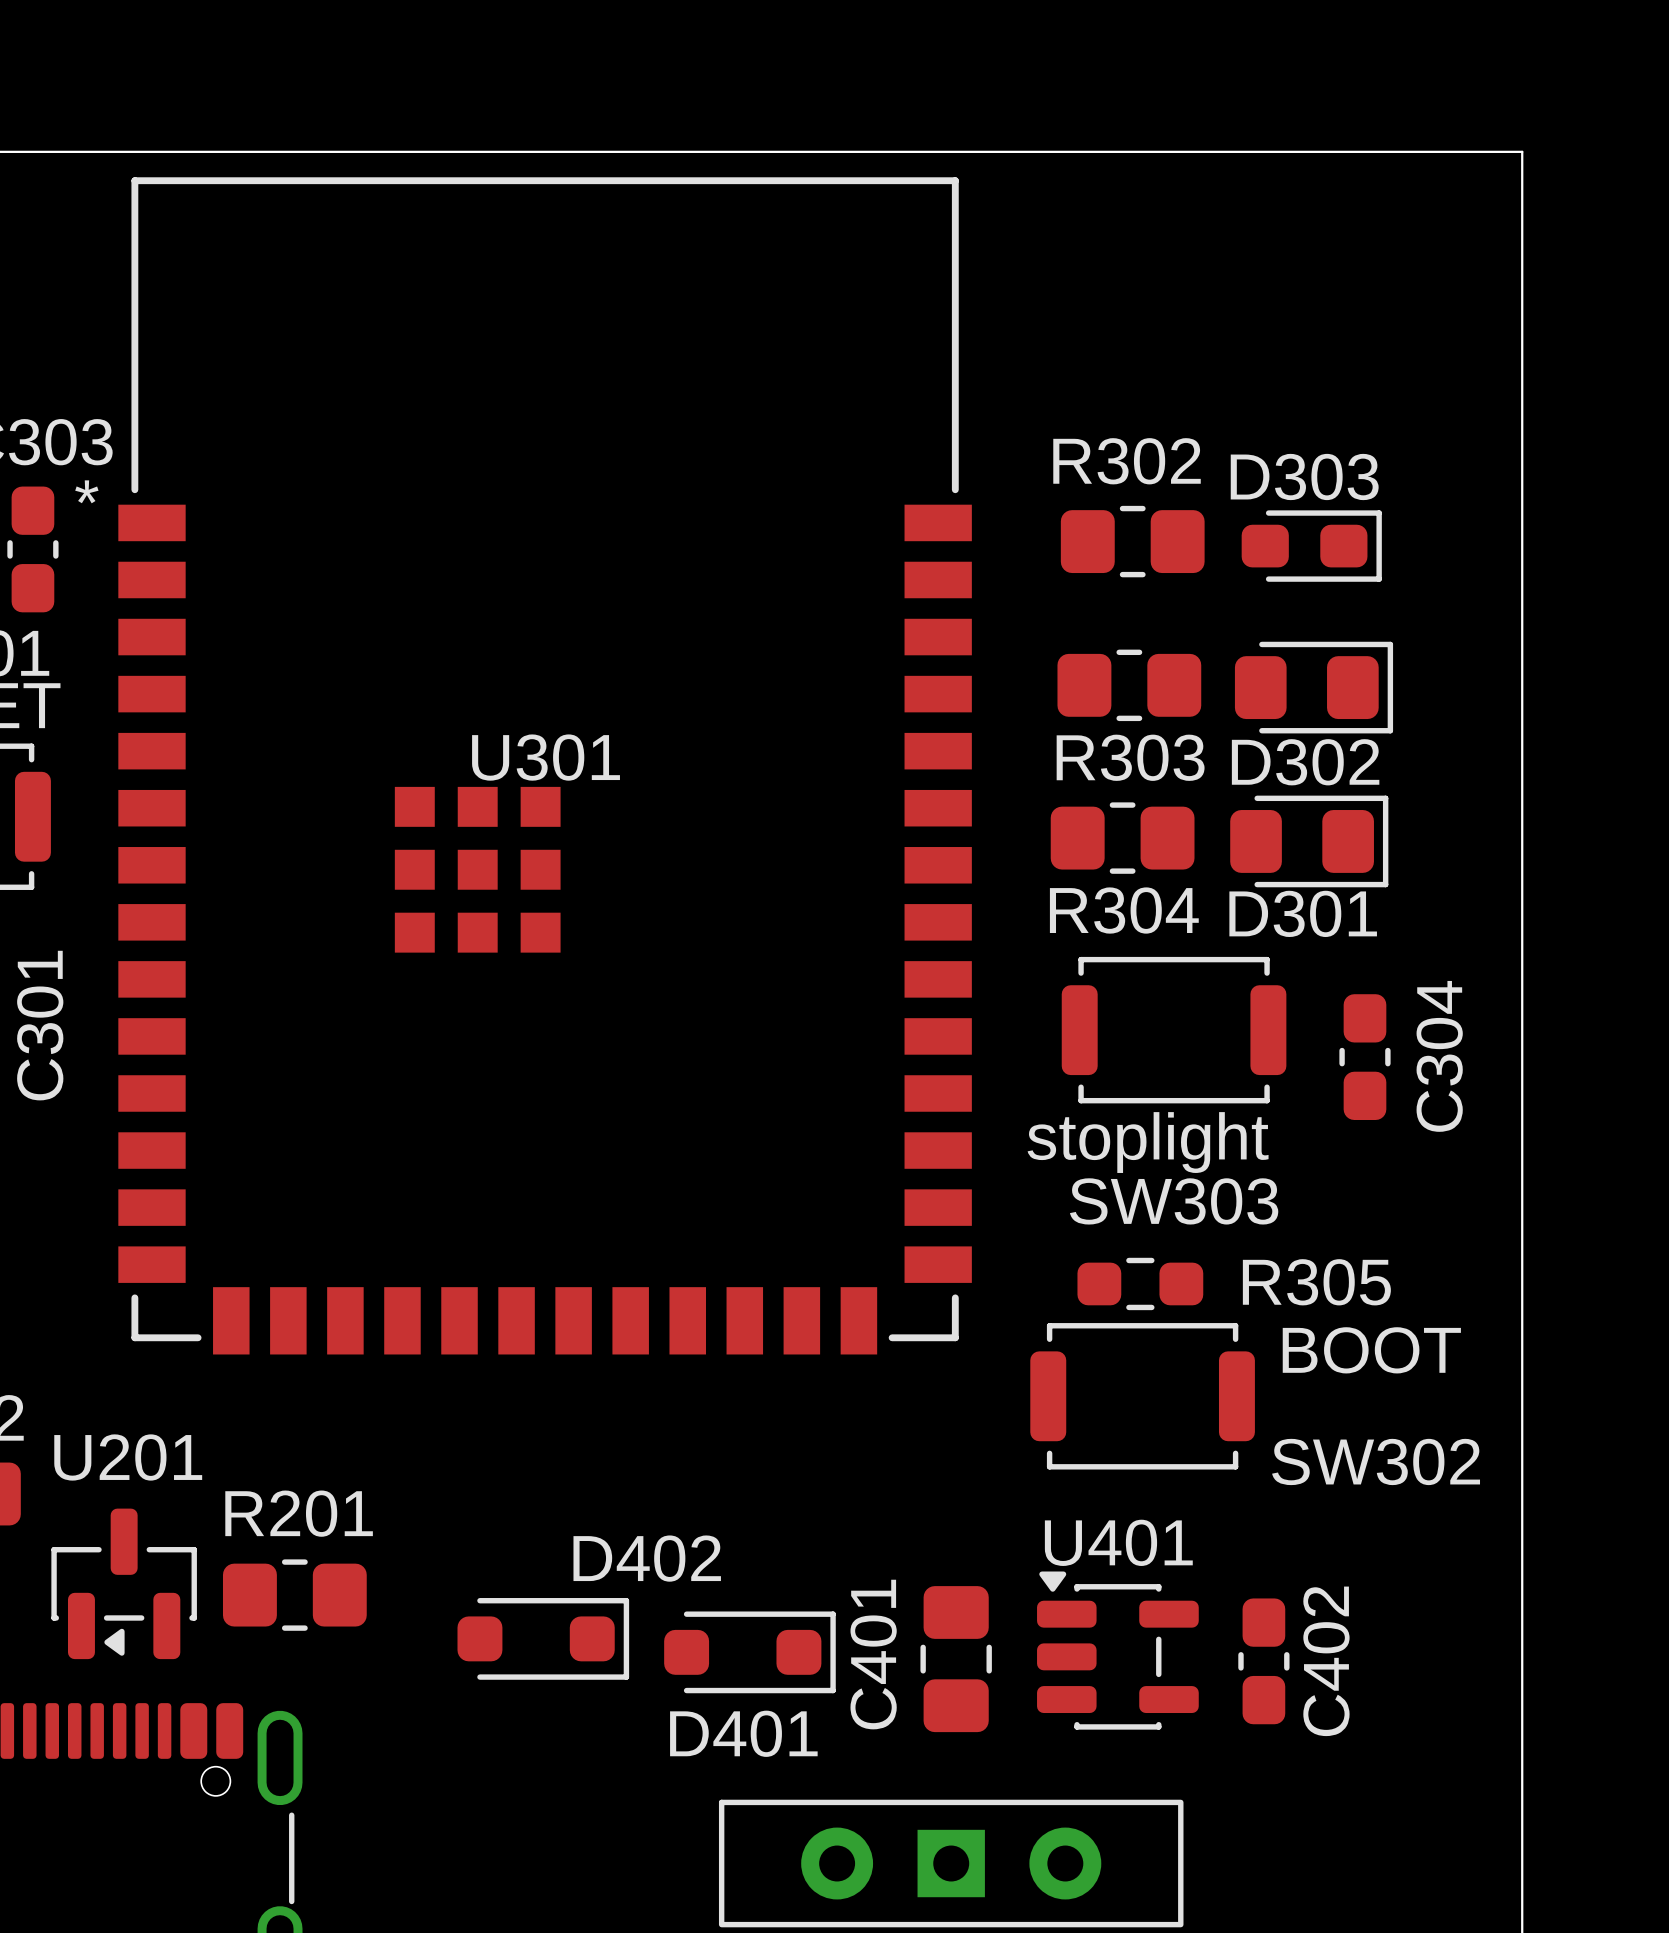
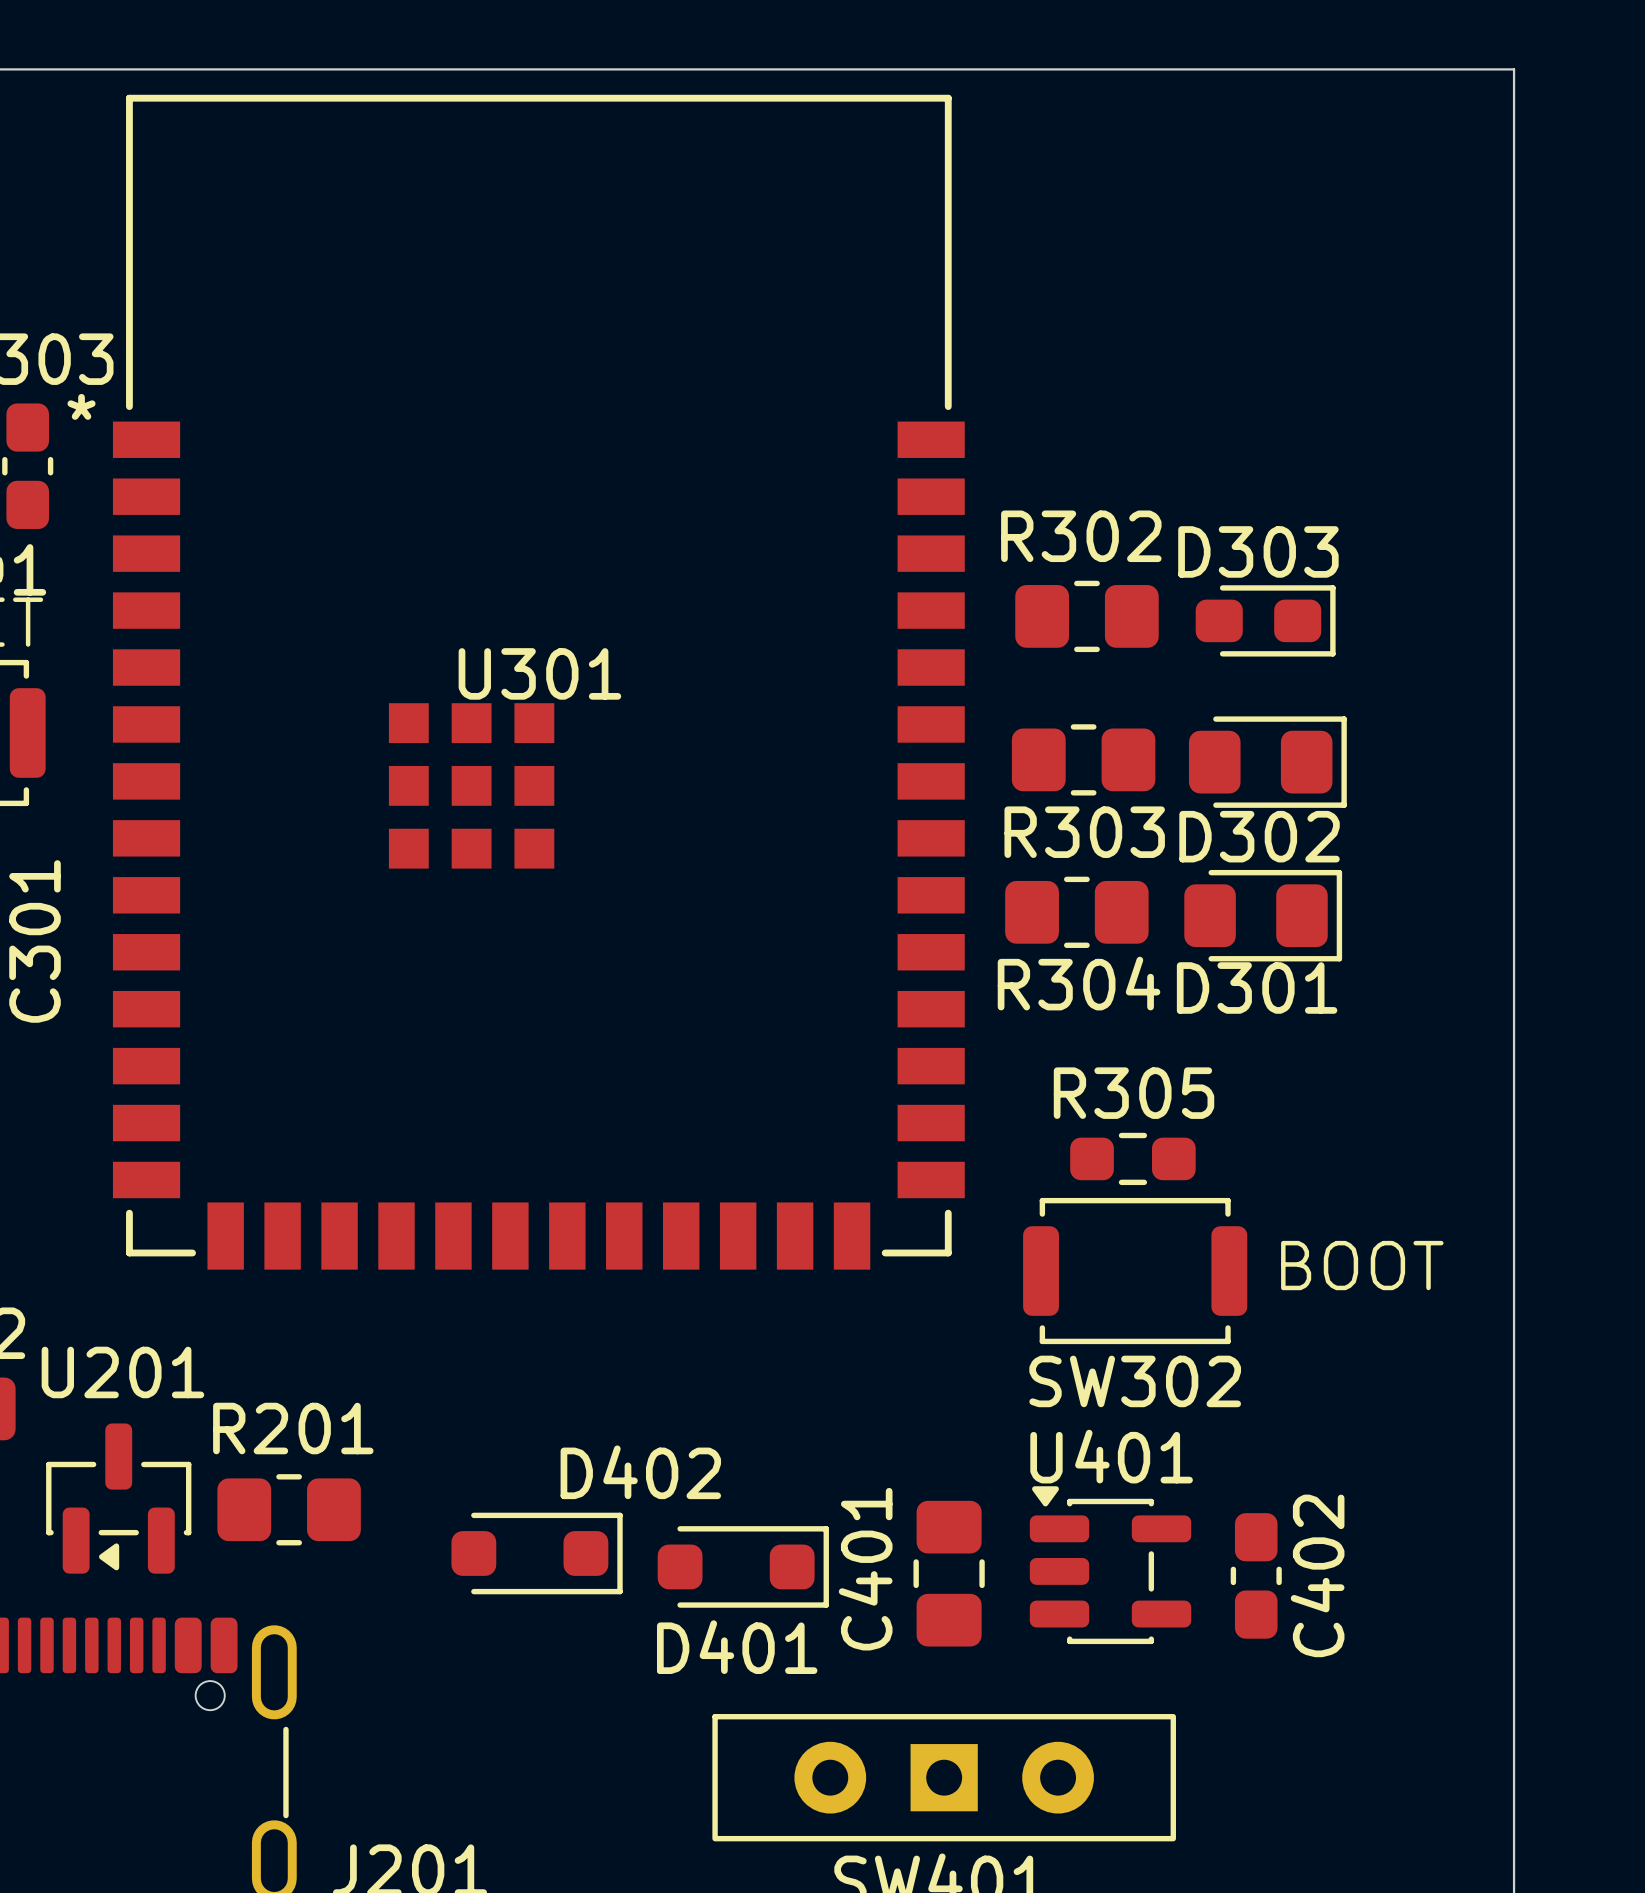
R302 position: (1132, 541) -> (1086, 616)
D303 position: (1311, 546) -> (1265, 620)
R303 position: (1129, 685) -> (1083, 759)
D302 position: (1314, 687) -> (1267, 762)
R304 position: (1122, 838) -> (1076, 912)
D301 position: (1309, 841) -> (1263, 915)
SW303: (1174, 1030) -> none
C304: (1364, 1057) -> none
text: stoplight (1148, 1142) -> none
R305 name position: R305 (1316, 1282) -> R305 (1134, 1093)
R305 position: (1140, 1283) -> (1132, 1158)
SW302 position: (1142, 1396) -> (1135, 1271)
SW302 name position: SW302 (1376, 1461) -> SW302 (1135, 1381)

